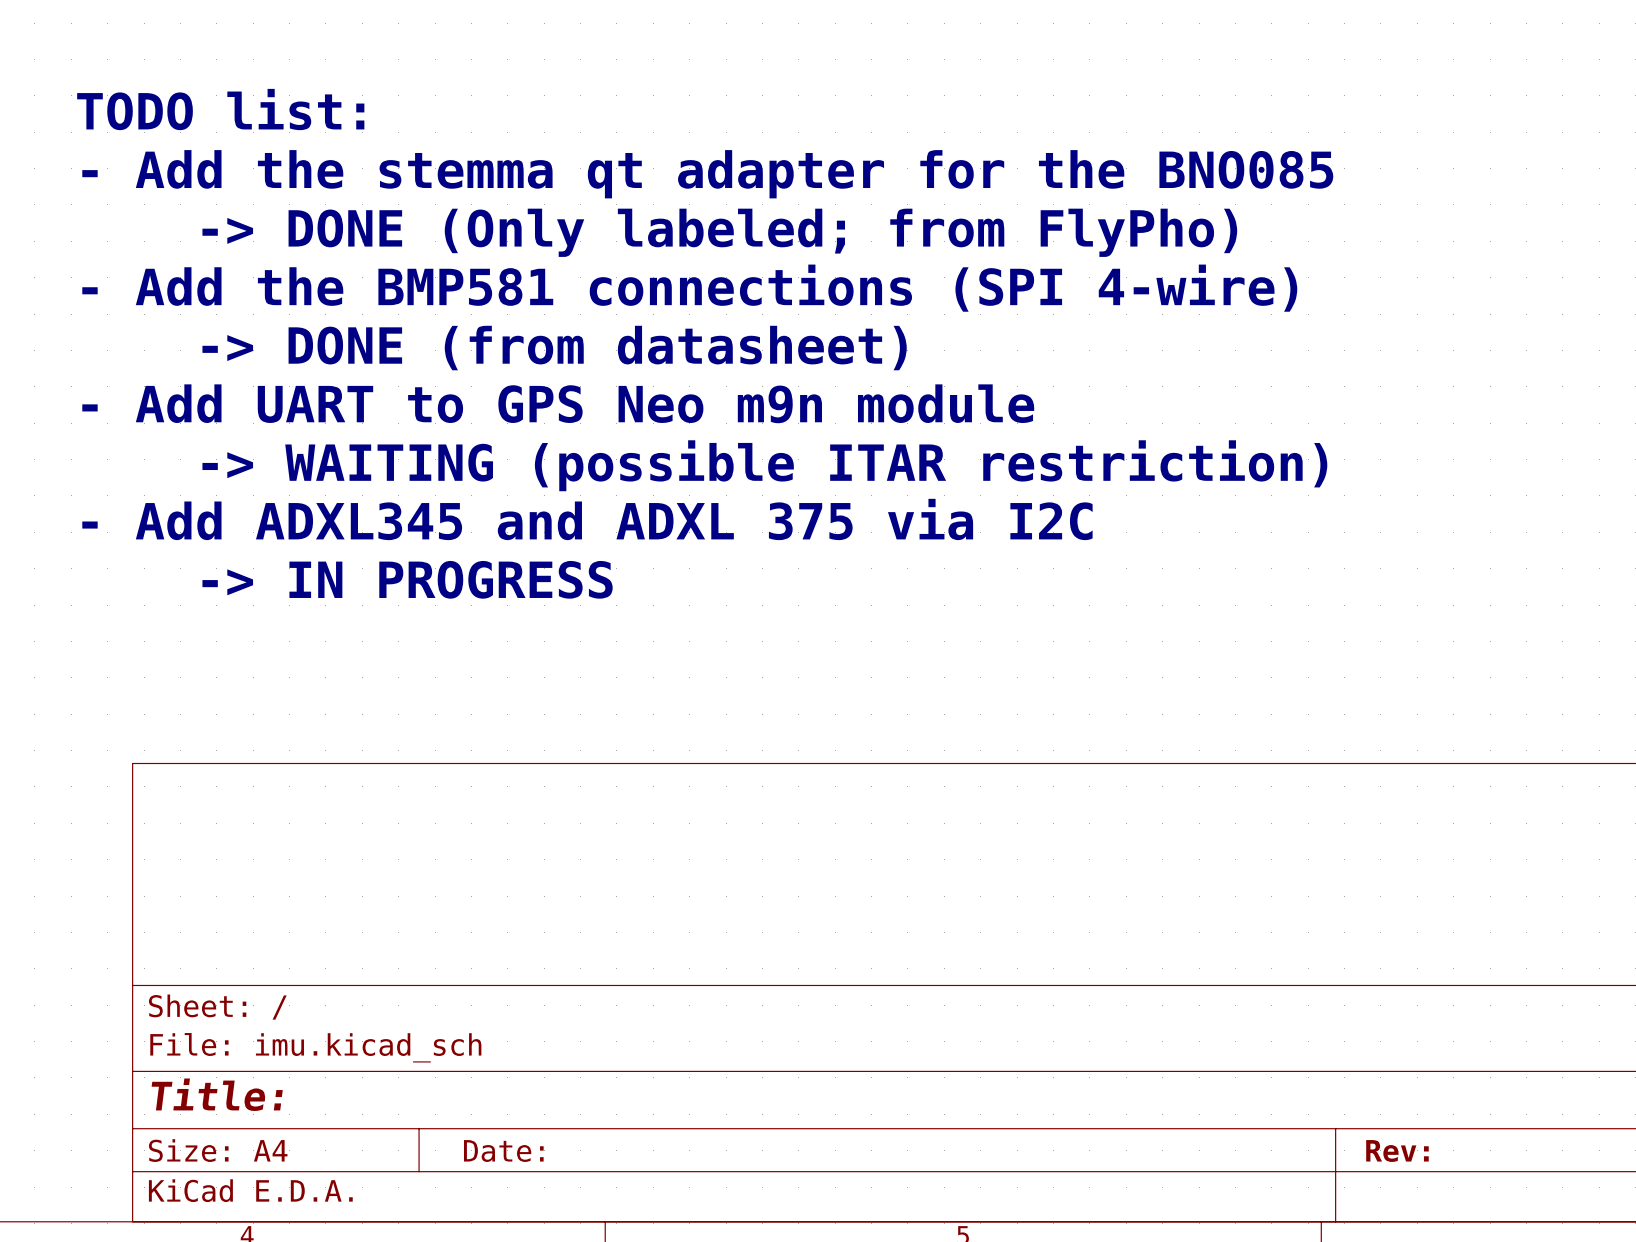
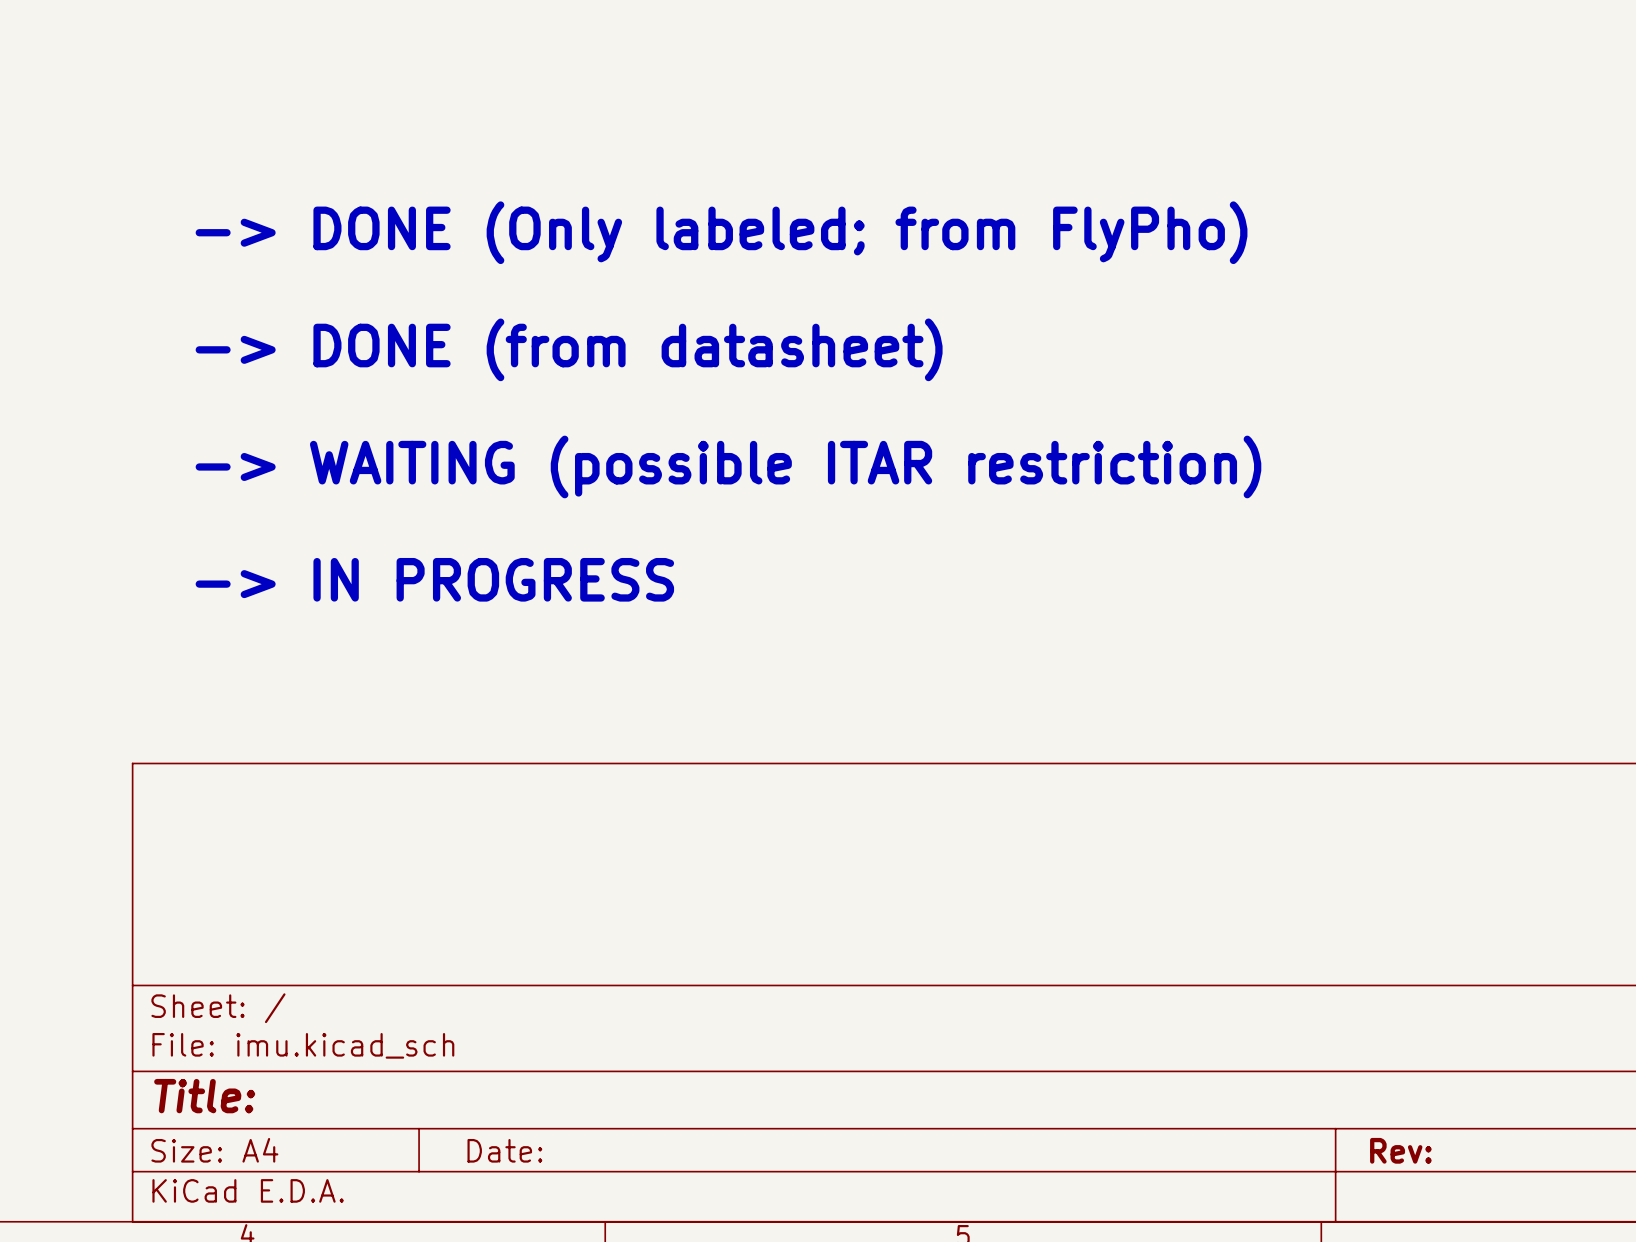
text: TODO list: (220, 109) -> none
text: - Add the stemma qt adapter for the BNO085 (707, 174) -> none
text: - Add the BMP581 connections (SPI 4-wire) (689, 288) -> none
text: - Add UART to GPS Neo m9n module (558, 403) -> none
text: - Add ADXL345 and ADXL 375 via I2C (587, 519) -> none

